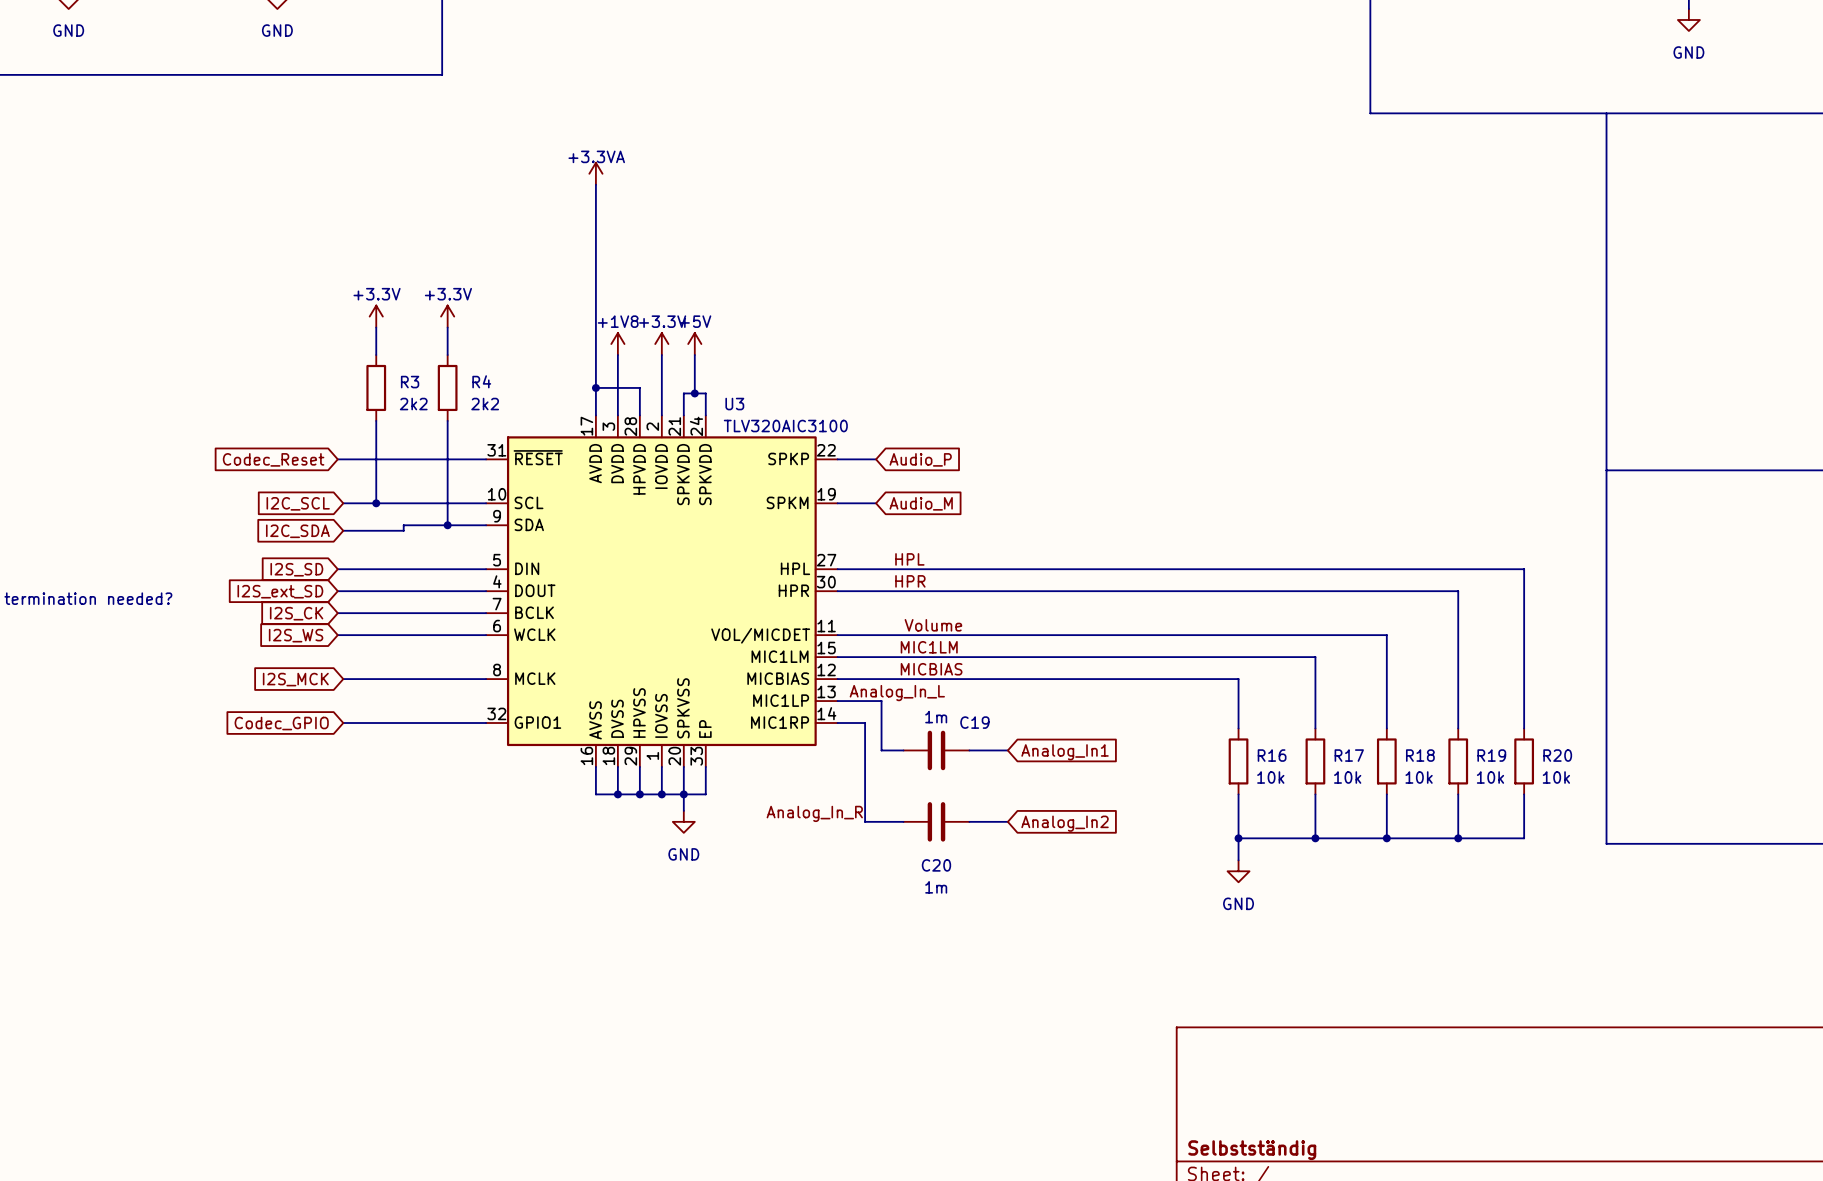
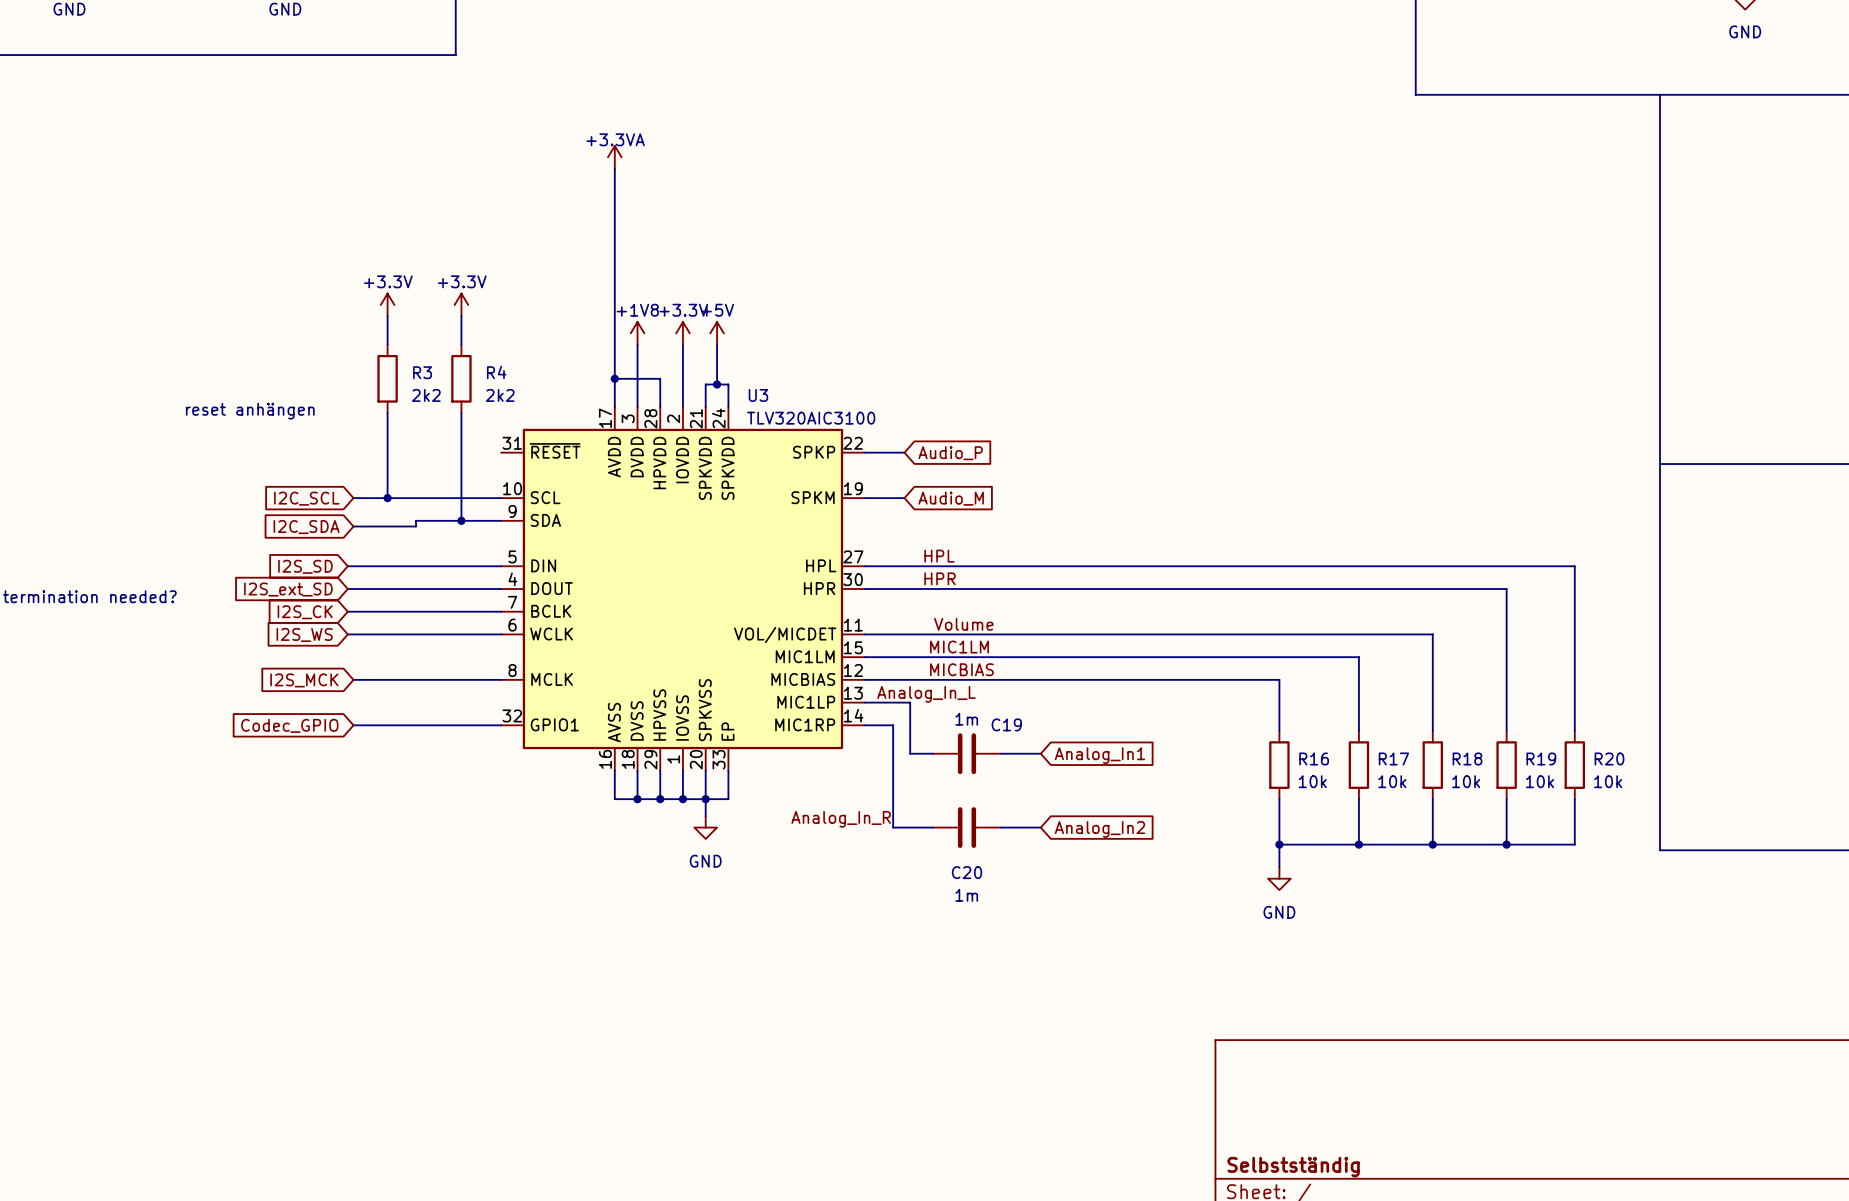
text: none -> reset anhängen (250, 411)
global label: Codec_Reset (273, 459) -> none
wire: (337, 459) (486, 459) -> none

